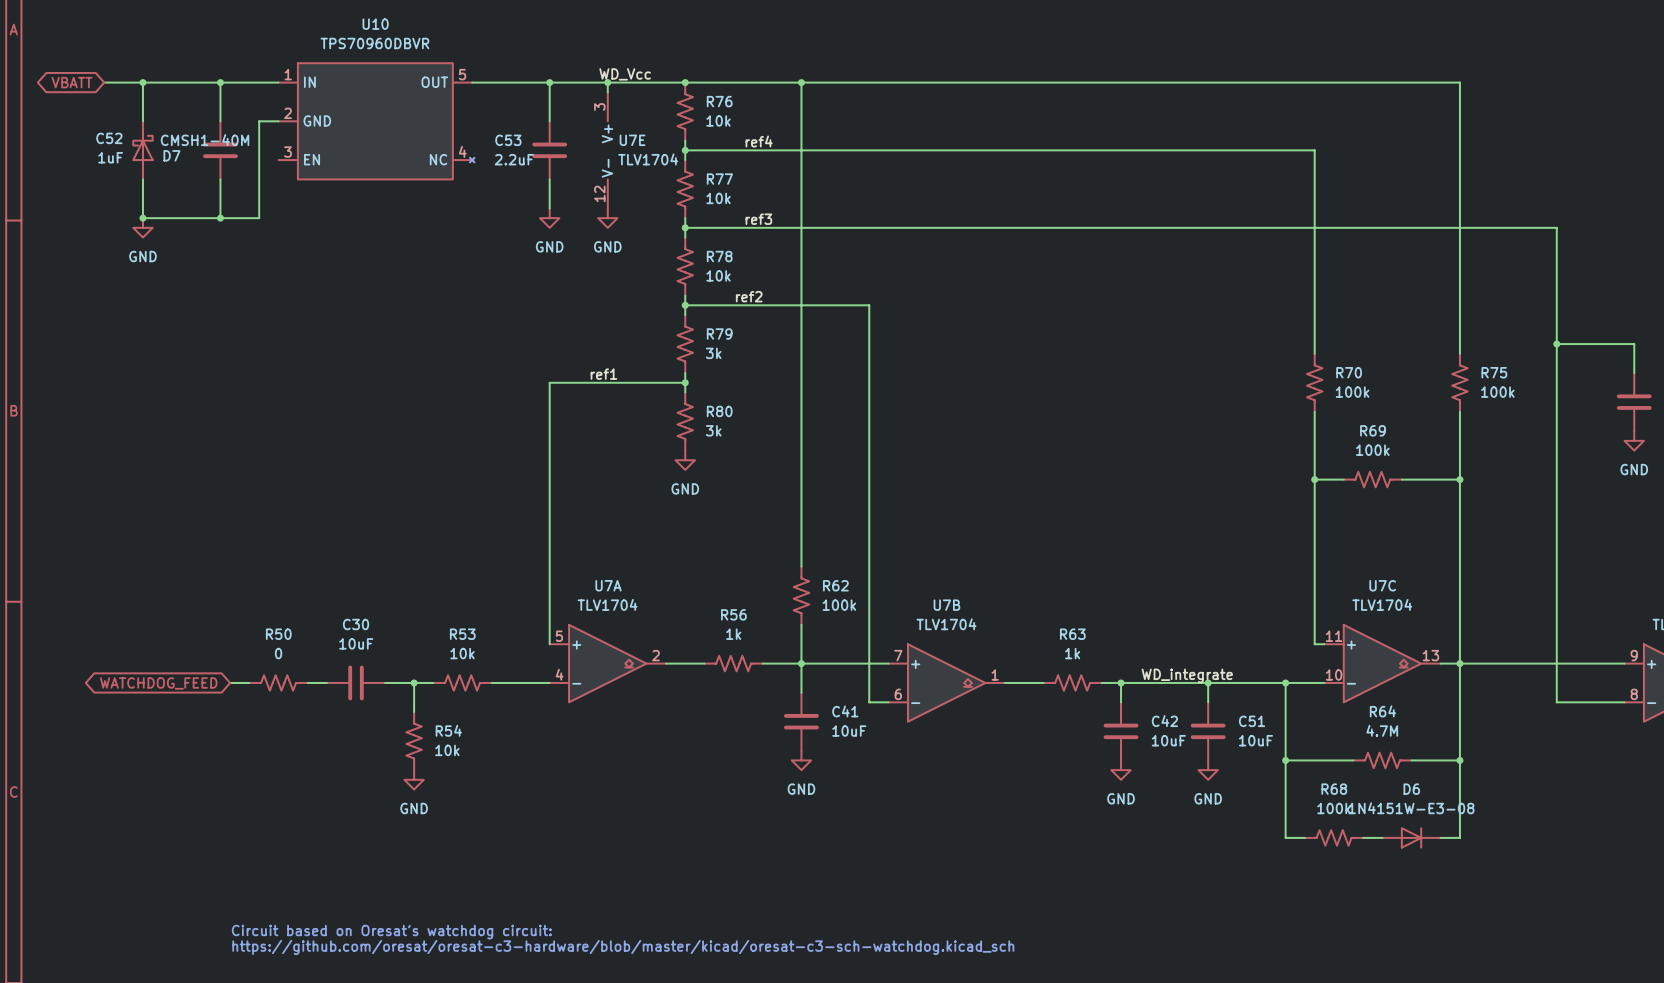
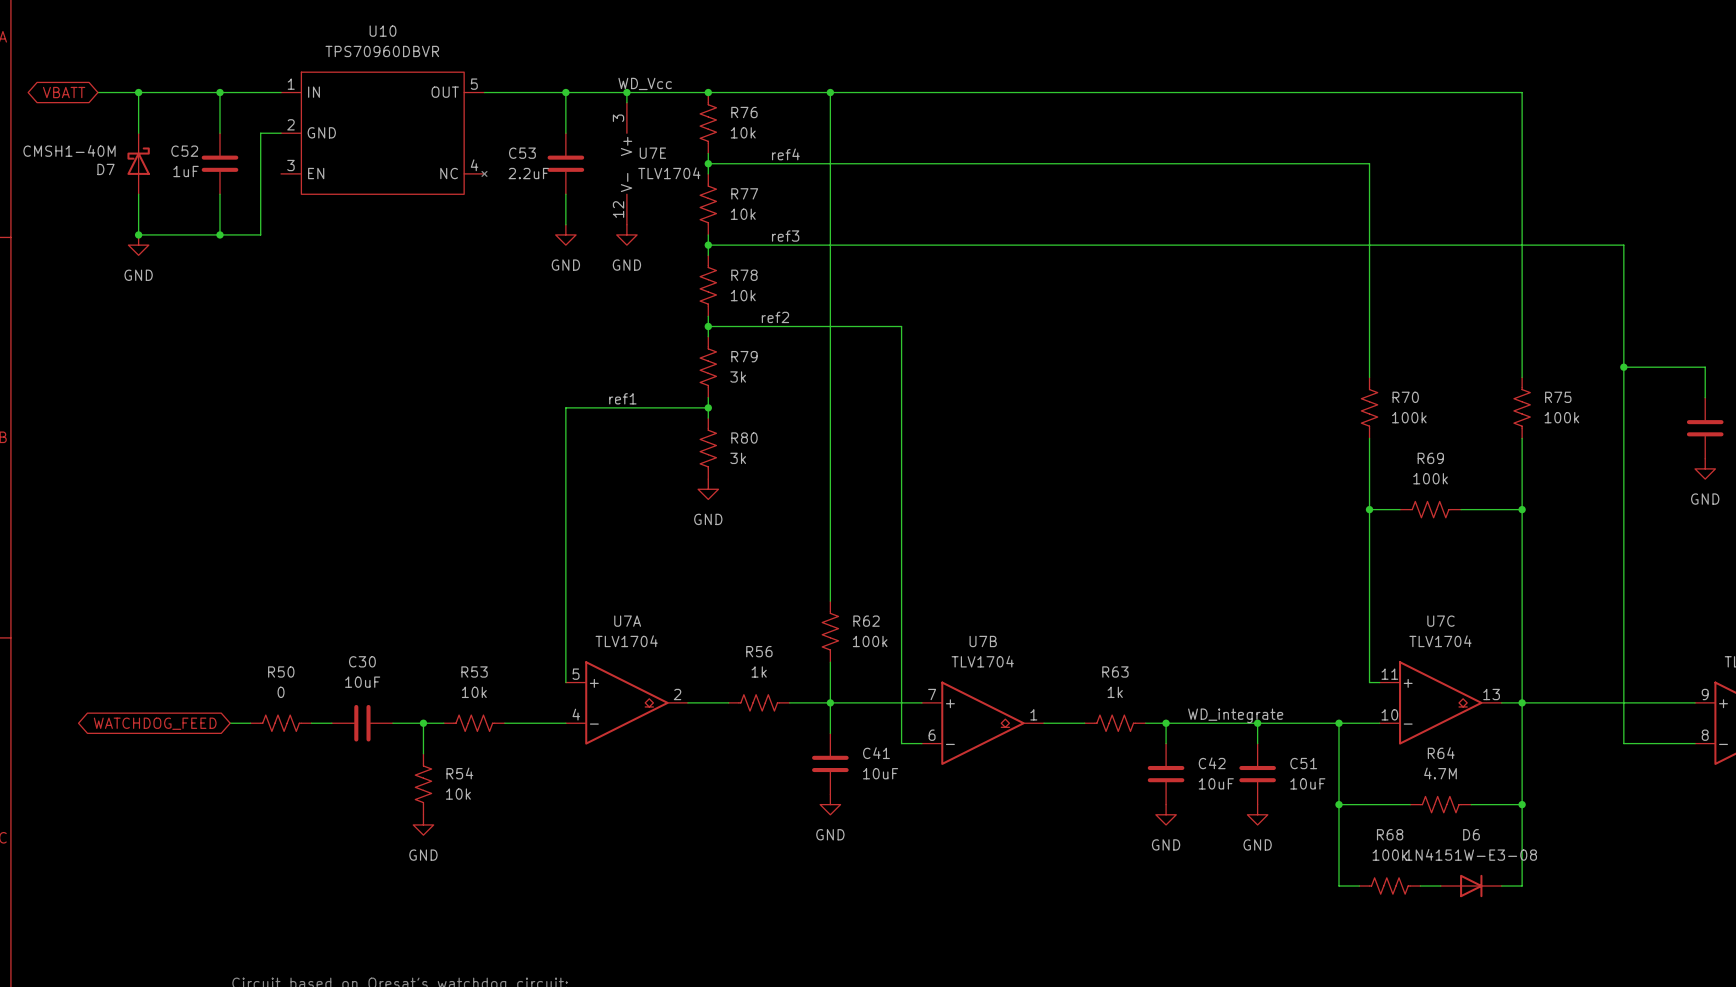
C52 name position: C52 (109, 138) -> C52 (184, 151)
D7 value position: CMSH1-40M (205, 140) -> CMSH1-40M (69, 150)
D7 name position: D7 (171, 155) -> D7 (105, 169)
C52 value position: 1uF (110, 157) -> 1uF (186, 171)

